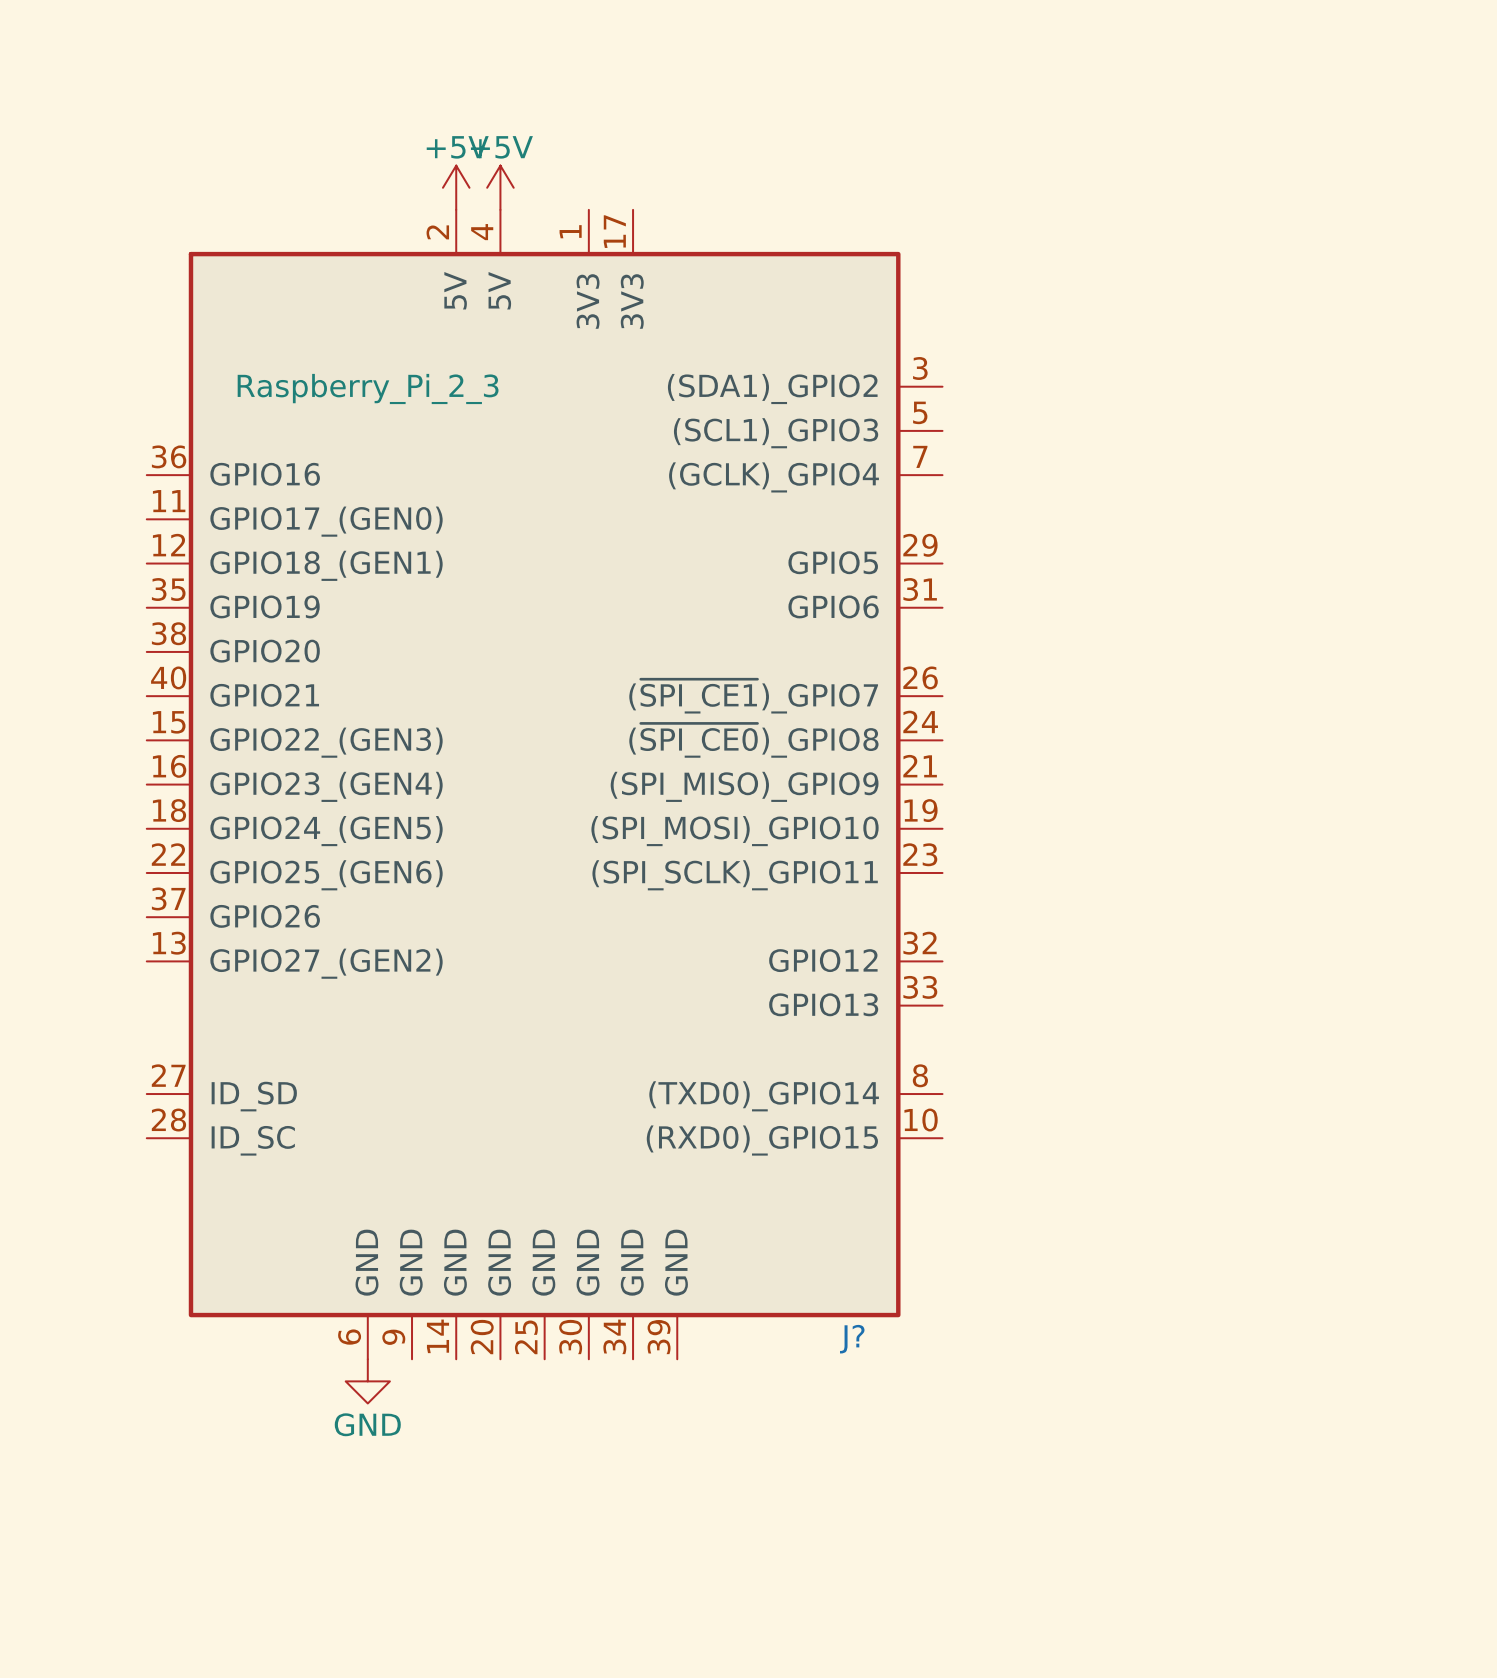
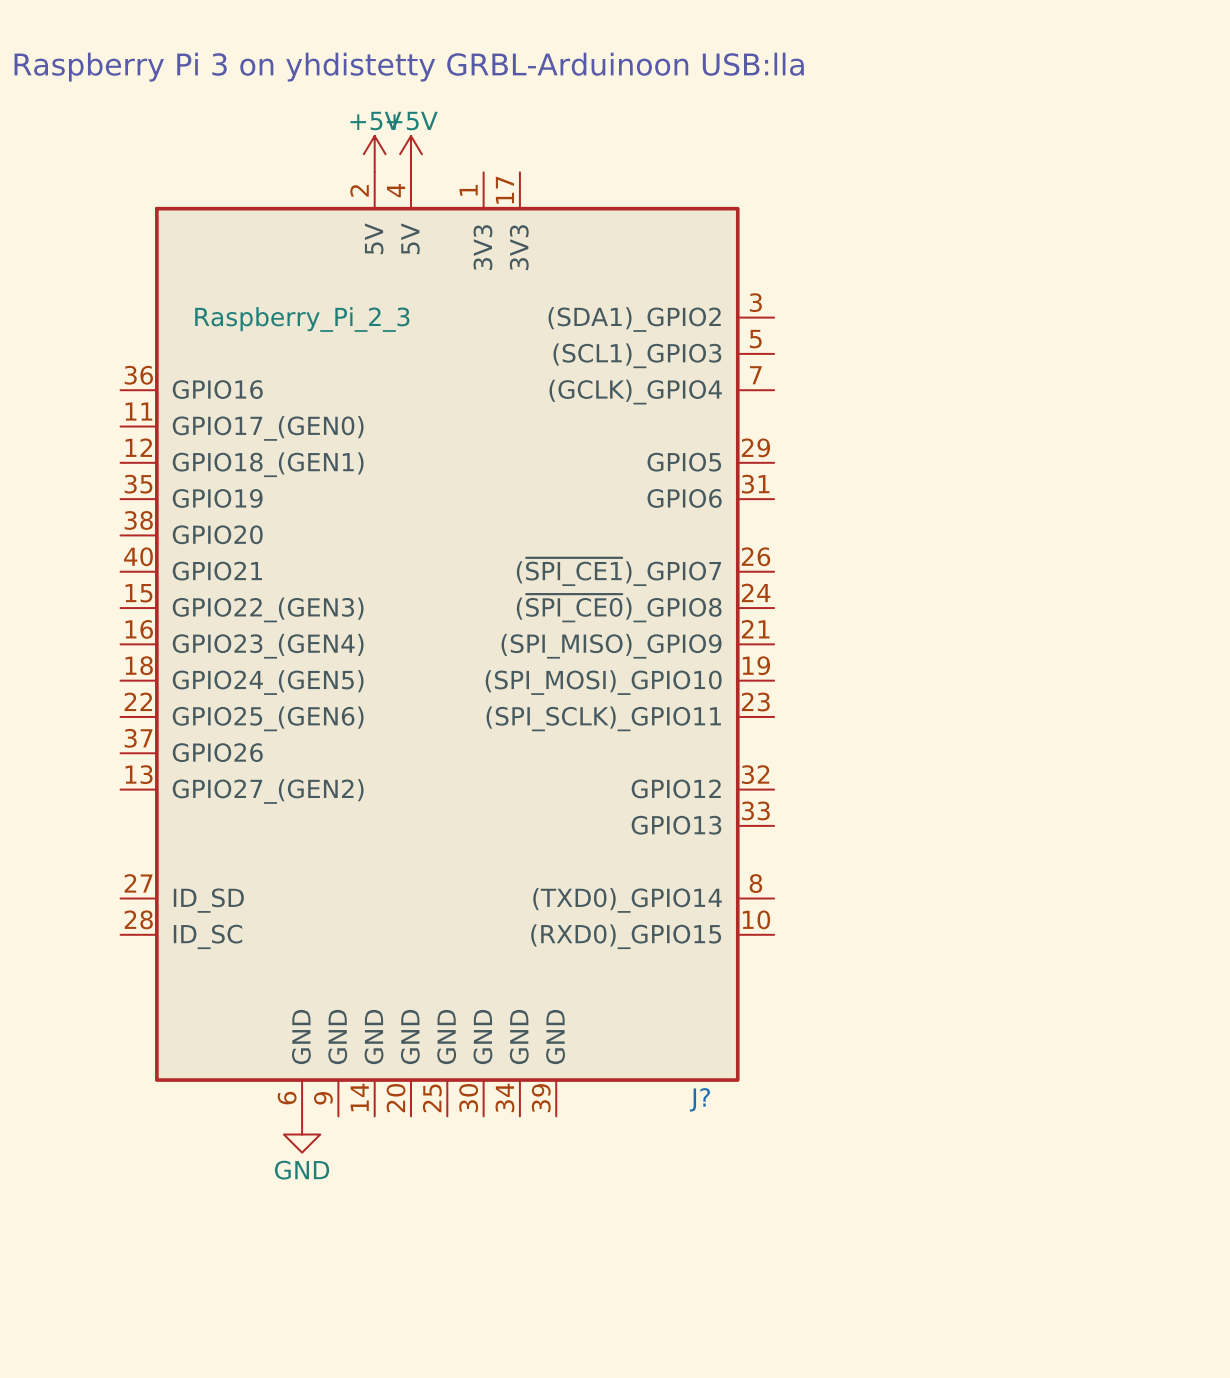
text: none -> Raspberry Pi 3 on yhdistetty GRBL-Arduinoon USB:lla (409, 67)

